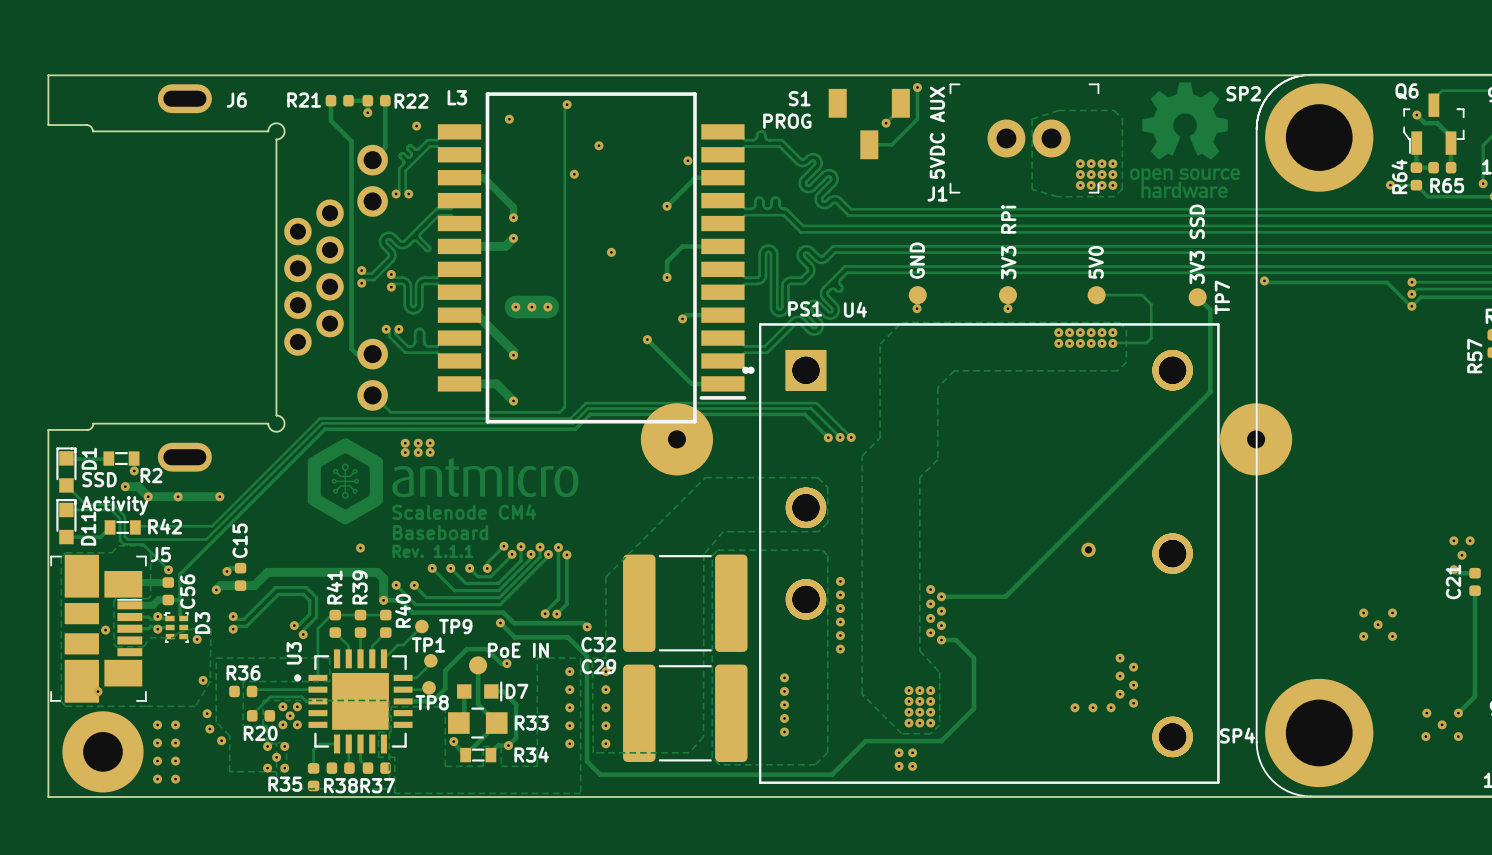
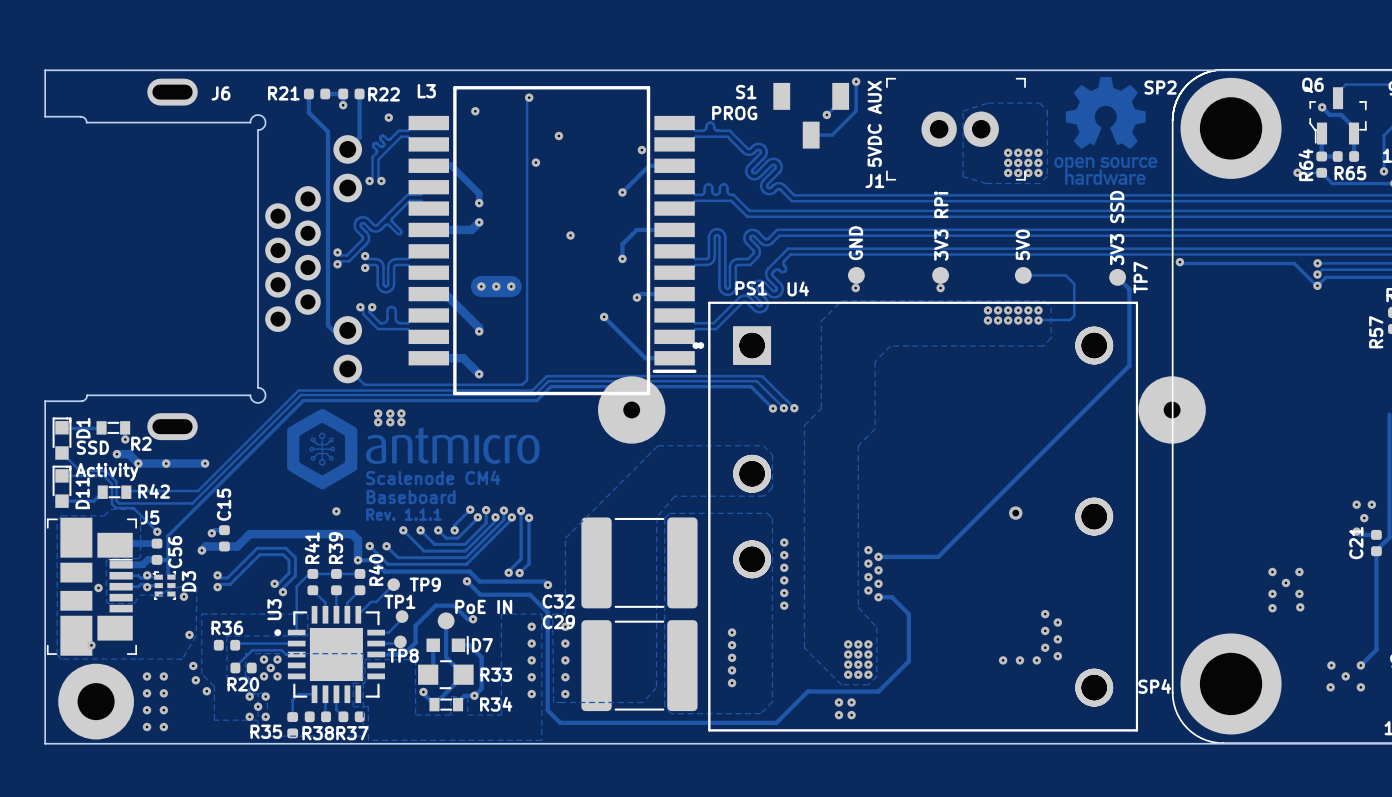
track: none -> (1389, 414) (1389, 537) (1376, 550)
via: none -> (1300, 607)
via: none -> (1272, 608)

